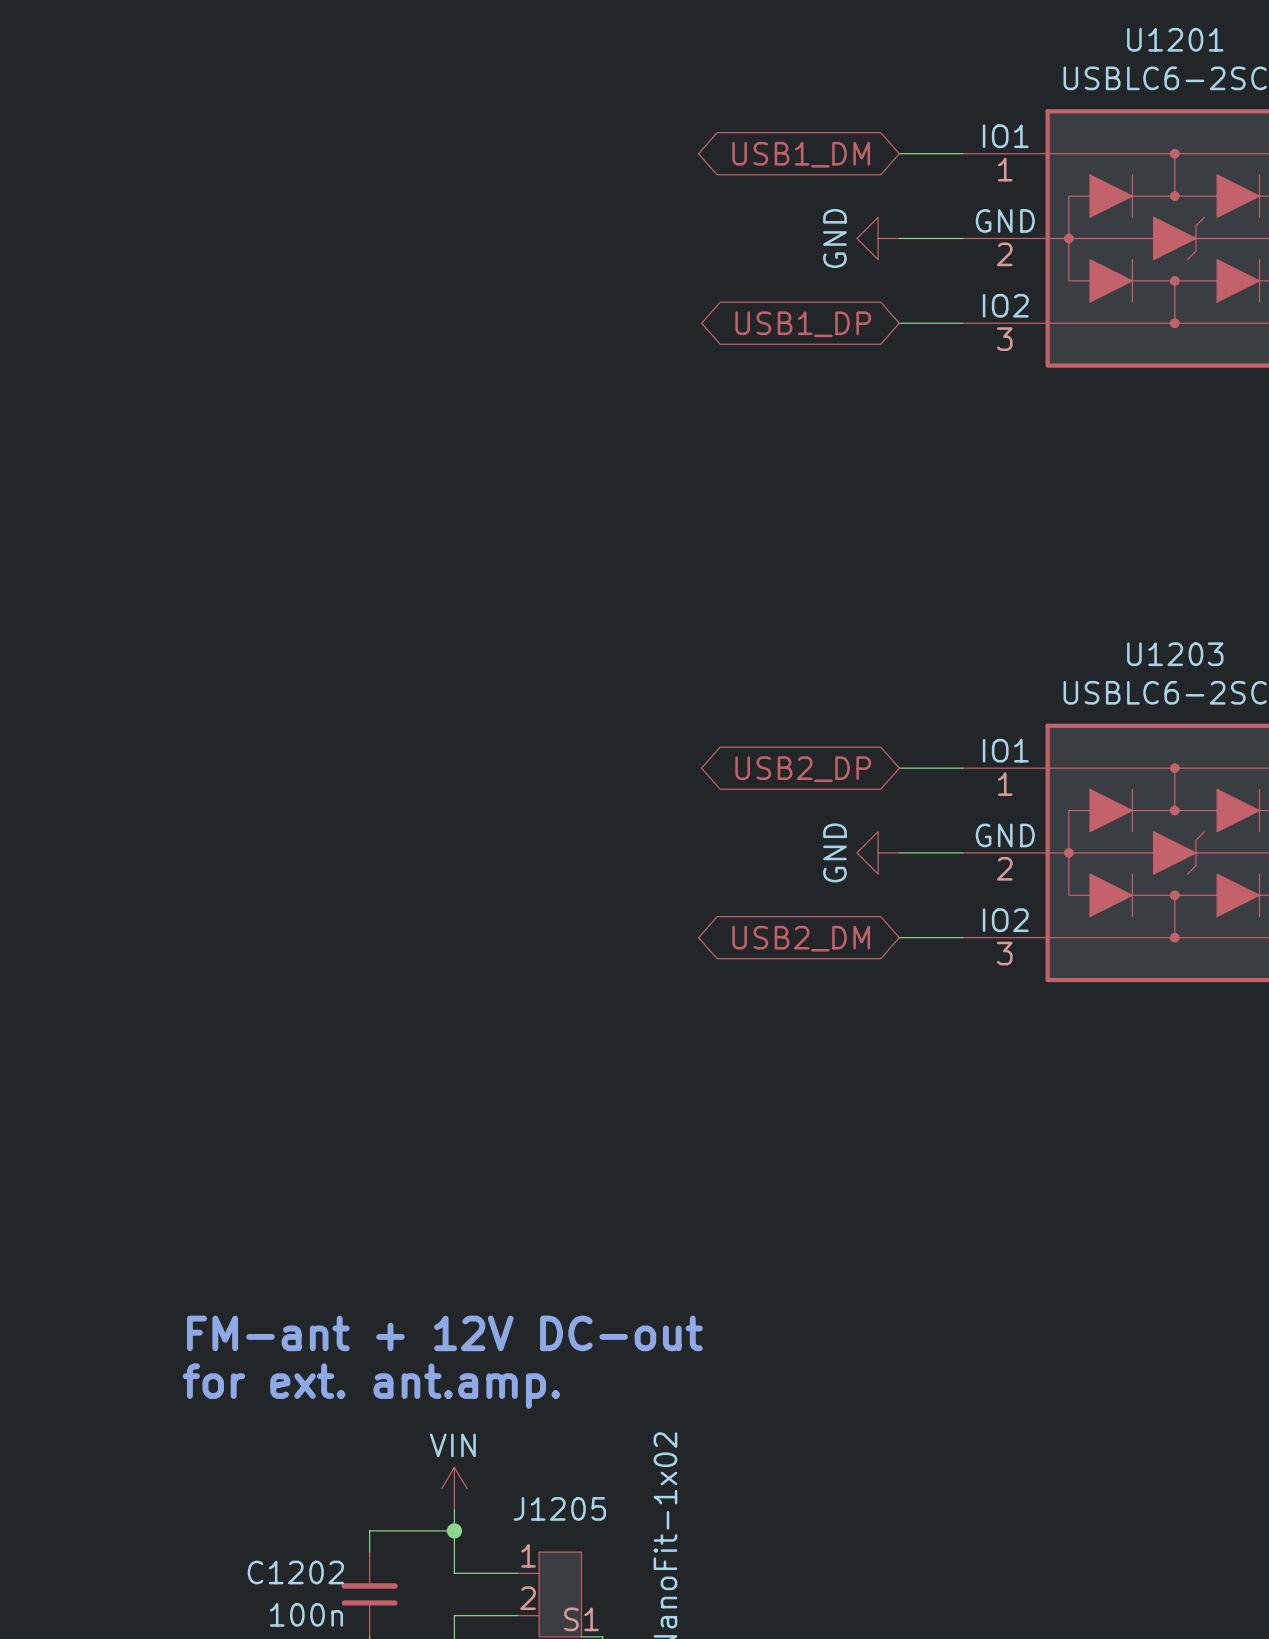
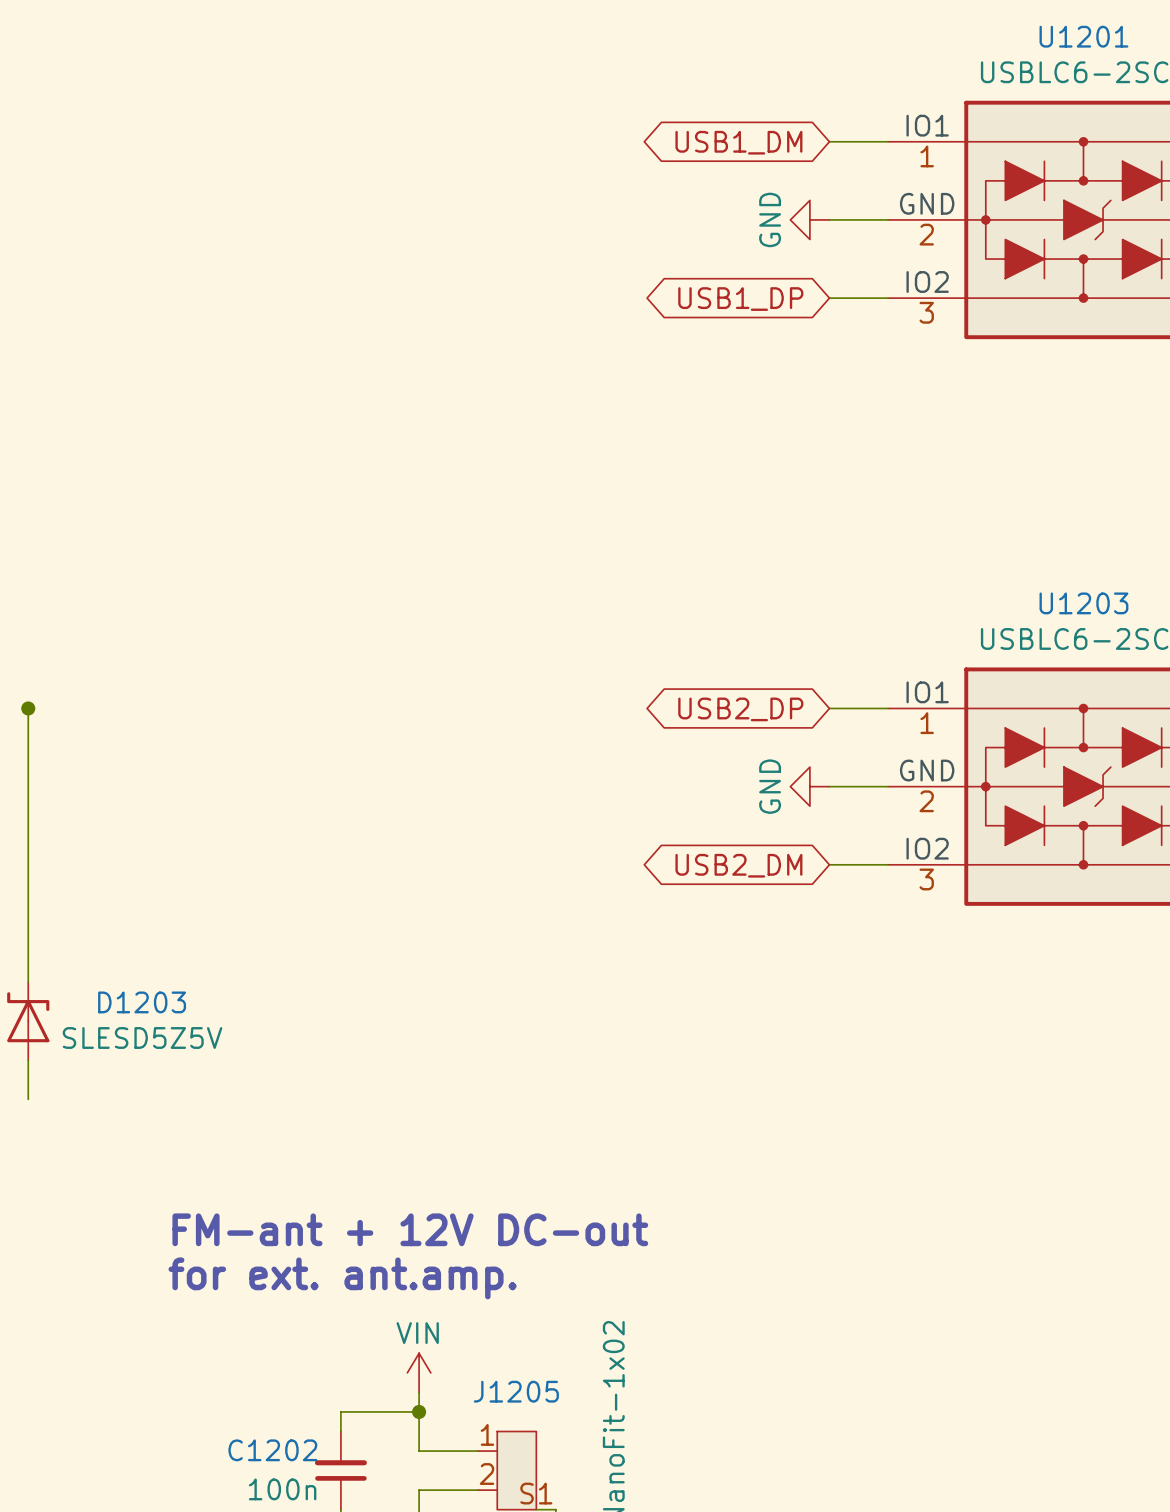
wire: none -> (28, 708) (28, 982)
junction: none -> (28, 708)
D1203: none -> SLESD5Z5V (28, 1021)
wire: none -> (28, 1060) (28, 1099)

